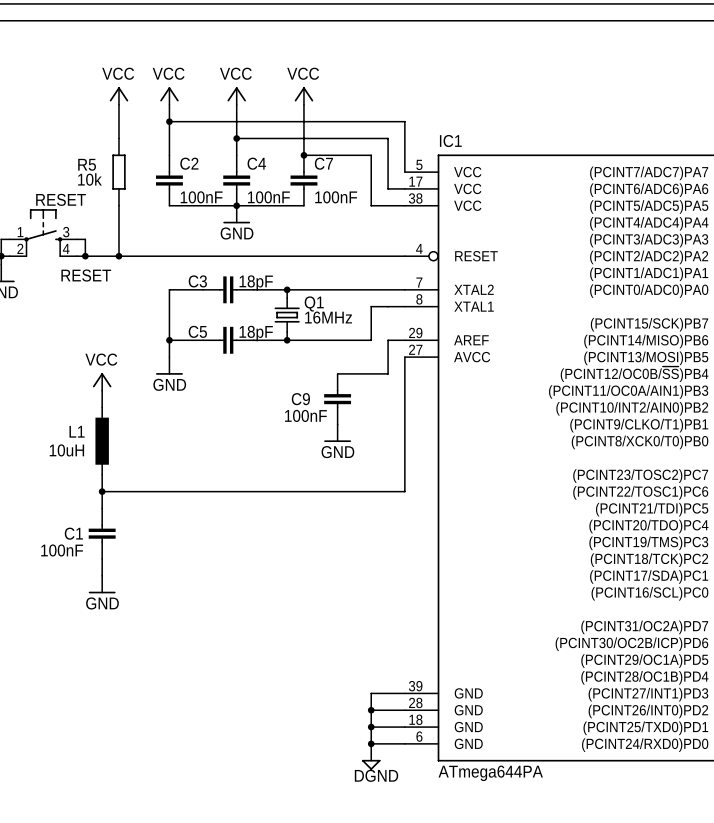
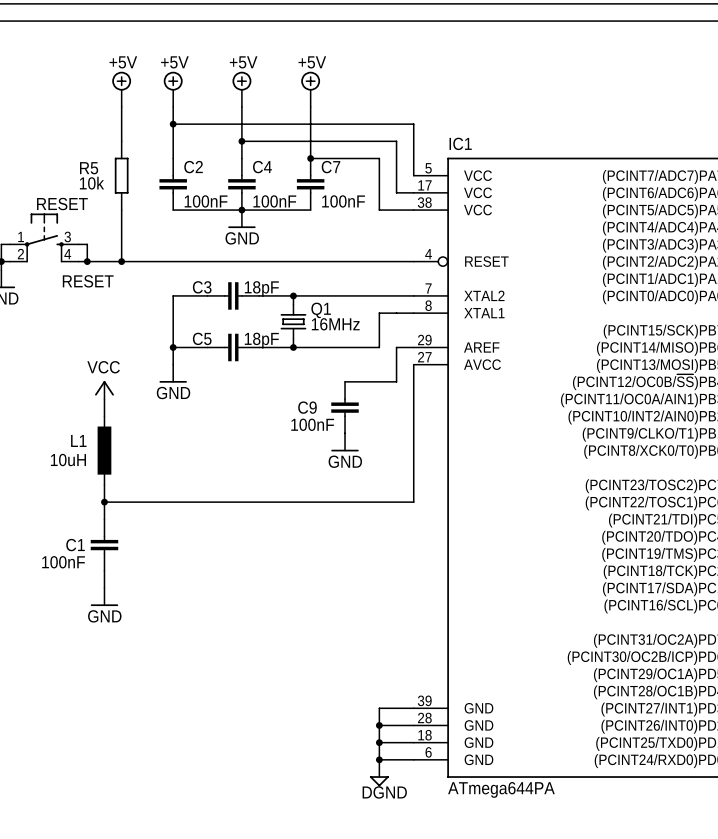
power symbol: none -> +5V (121, 89)
power symbol: none -> +5V (173, 89)
power symbol: none -> +5V (241, 89)
power symbol: none -> +5V (310, 89)
power symbol: VCC (118, 96) -> none
power symbol: VCC (169, 96) -> none
power symbol: VCC (236, 96) -> none
power symbol: VCC (303, 96) -> none

